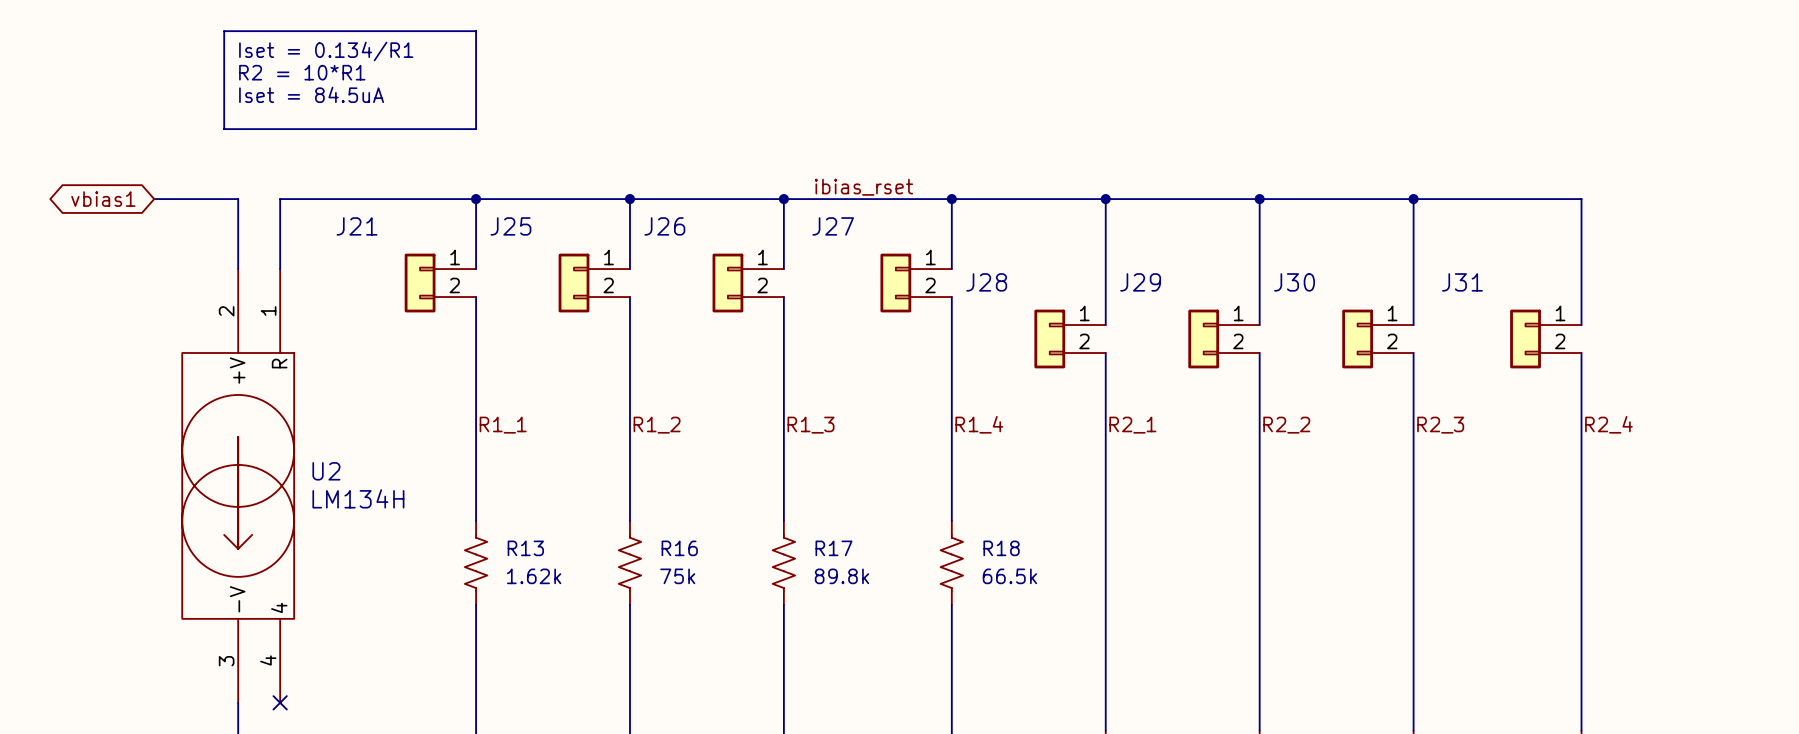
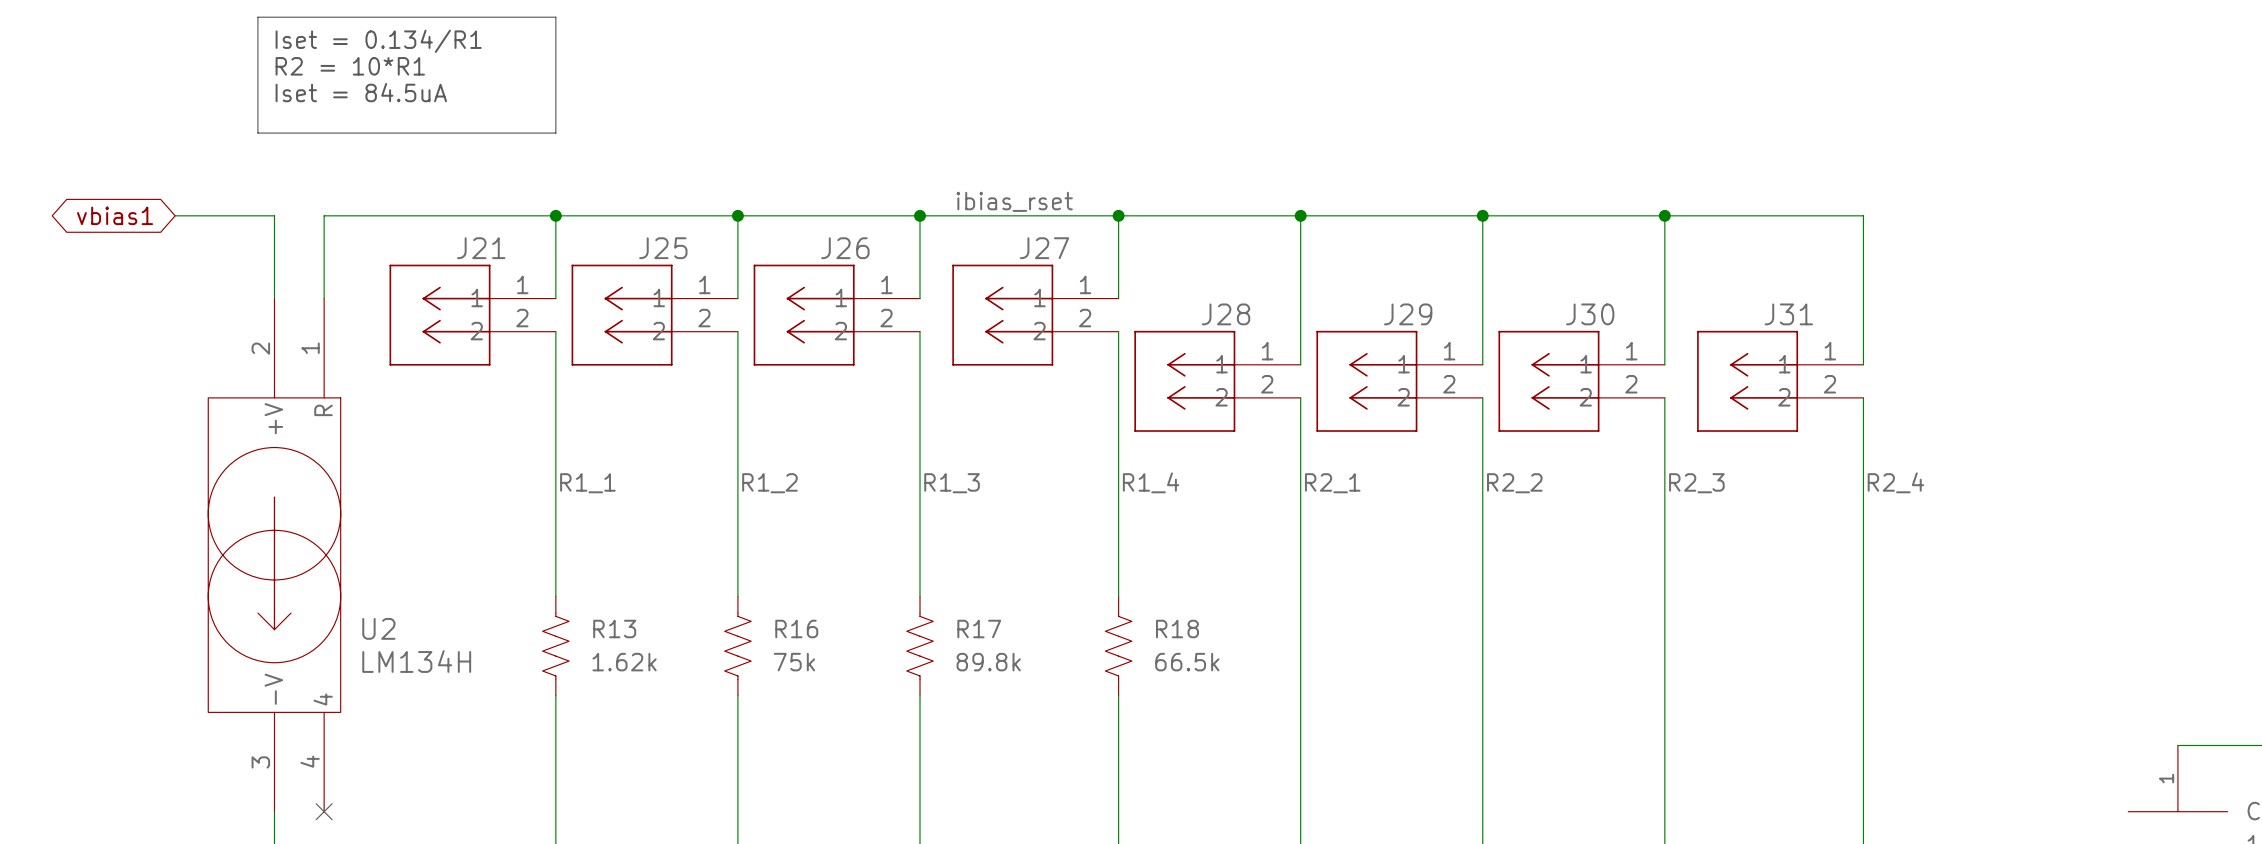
J21 name position: J21 (357, 226) -> J21 (481, 248)
J25 name position: J25 (510, 226) -> J25 (663, 248)
J26 name position: J26 (664, 226) -> J26 (845, 248)
J27 name position: J27 (833, 226) -> J27 (1044, 248)
J21 symbol: [404, 253, 477, 313] -> [389, 264, 556, 366]
J25 symbol: [558, 253, 630, 313] -> [571, 264, 738, 366]
J26 symbol: [712, 253, 784, 313] -> [753, 264, 921, 366]
J27 symbol: [880, 253, 952, 313] -> [952, 264, 1119, 366]
J28 name position: J28 (986, 282) -> J28 (1226, 314)
J29 name position: J29 (1140, 282) -> J29 (1408, 314)
J30 name position: J30 (1294, 282) -> J30 (1590, 314)
J31 name position: J31 (1462, 282) -> J31 (1788, 314)
J28 symbol: [1034, 309, 1106, 369] -> [1134, 330, 1301, 432]
J29 symbol: [1188, 309, 1260, 369] -> [1316, 330, 1483, 432]
J30 symbol: [1342, 309, 1414, 369] -> [1498, 330, 1665, 432]
J31 symbol: [1510, 309, 1582, 369] -> [1697, 330, 1864, 432]
U2 name position: U2 (326, 471) -> U2 (378, 628)
U2 value position: LM134H (358, 498) -> LM134H (416, 661)

